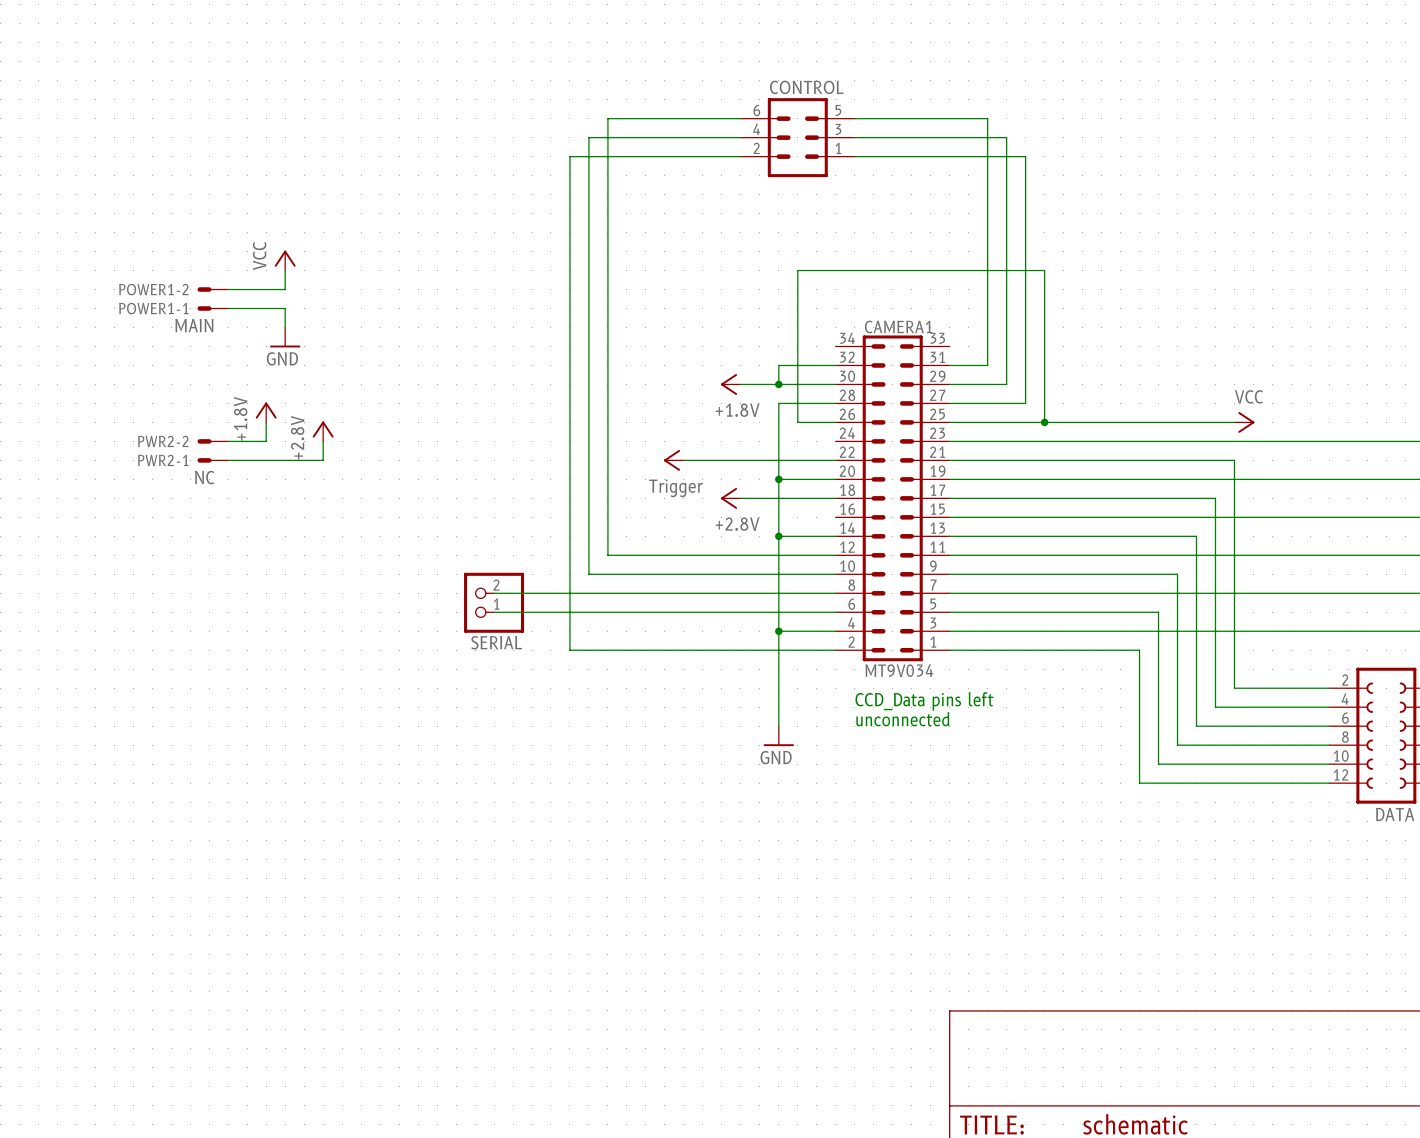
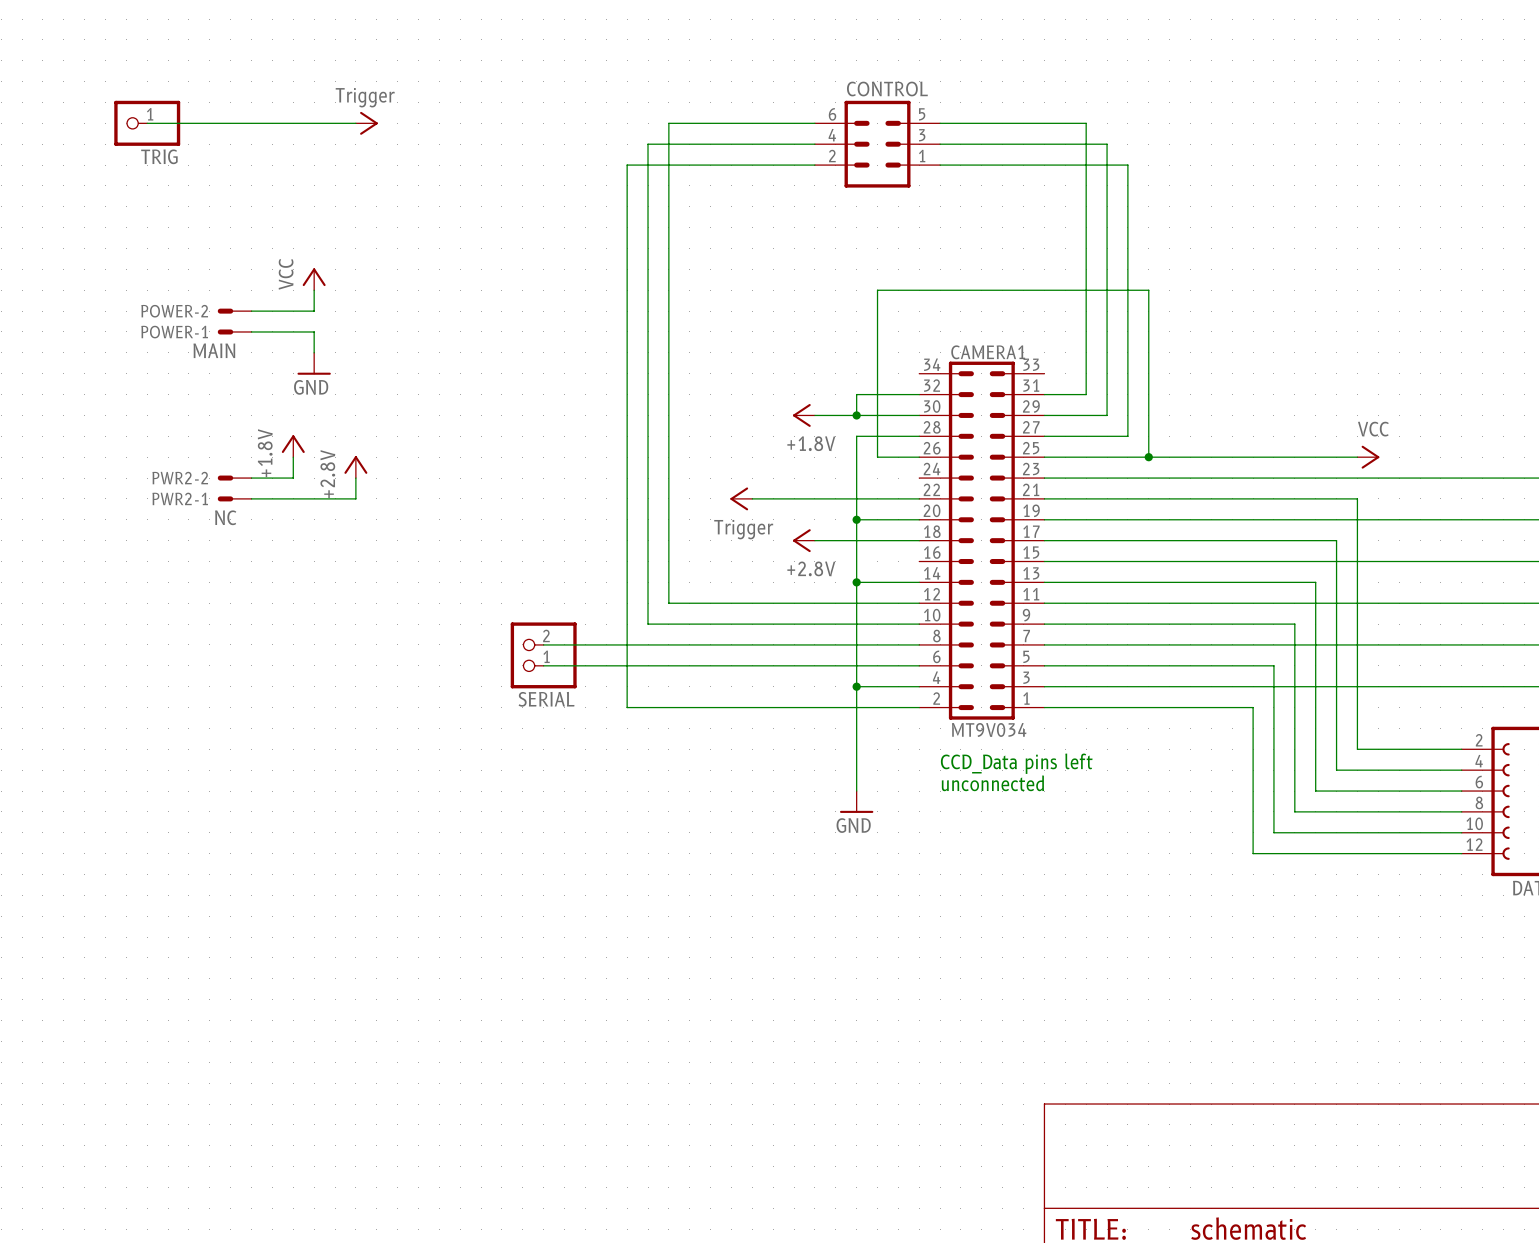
wire: none -> (147, 123) (355, 123)
TRIG: none -> (147, 123)
power symbol: none -> Trigger (366, 123)
POWER1-2 name: POWER1-2 (153, 289) -> POWER-2 (174, 311)
POWER1-1 name: POWER1-1 (153, 308) -> POWER-1 (174, 332)

